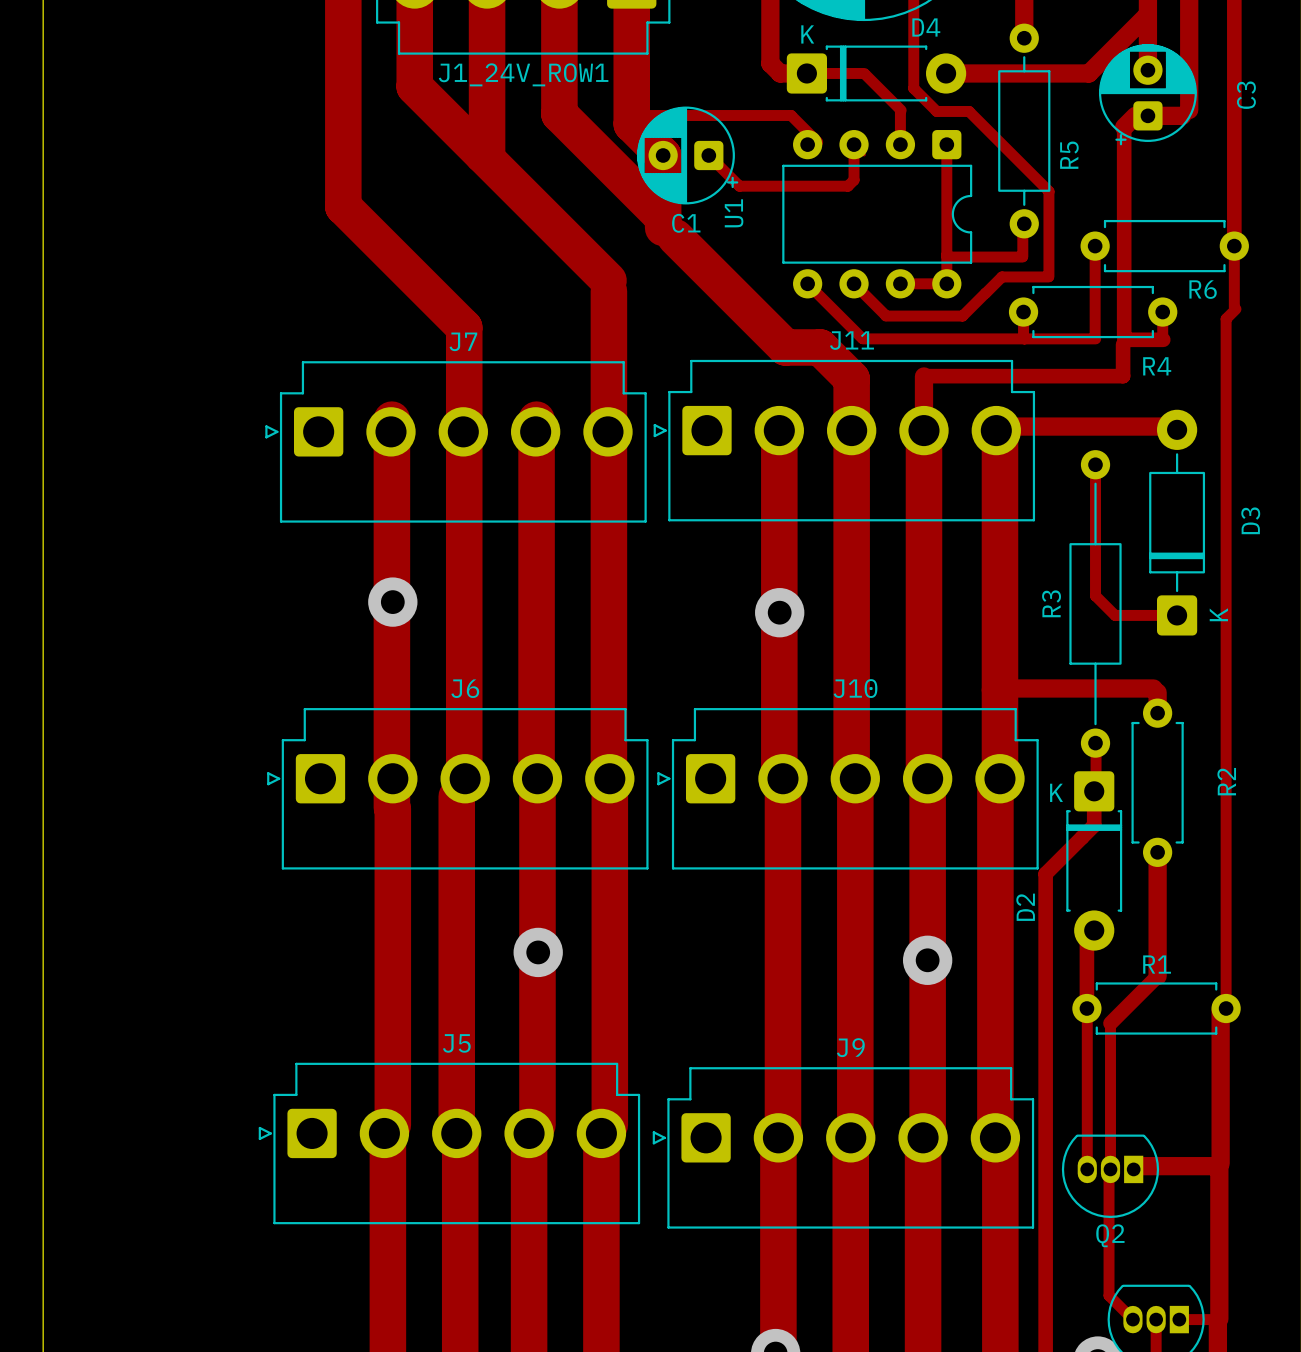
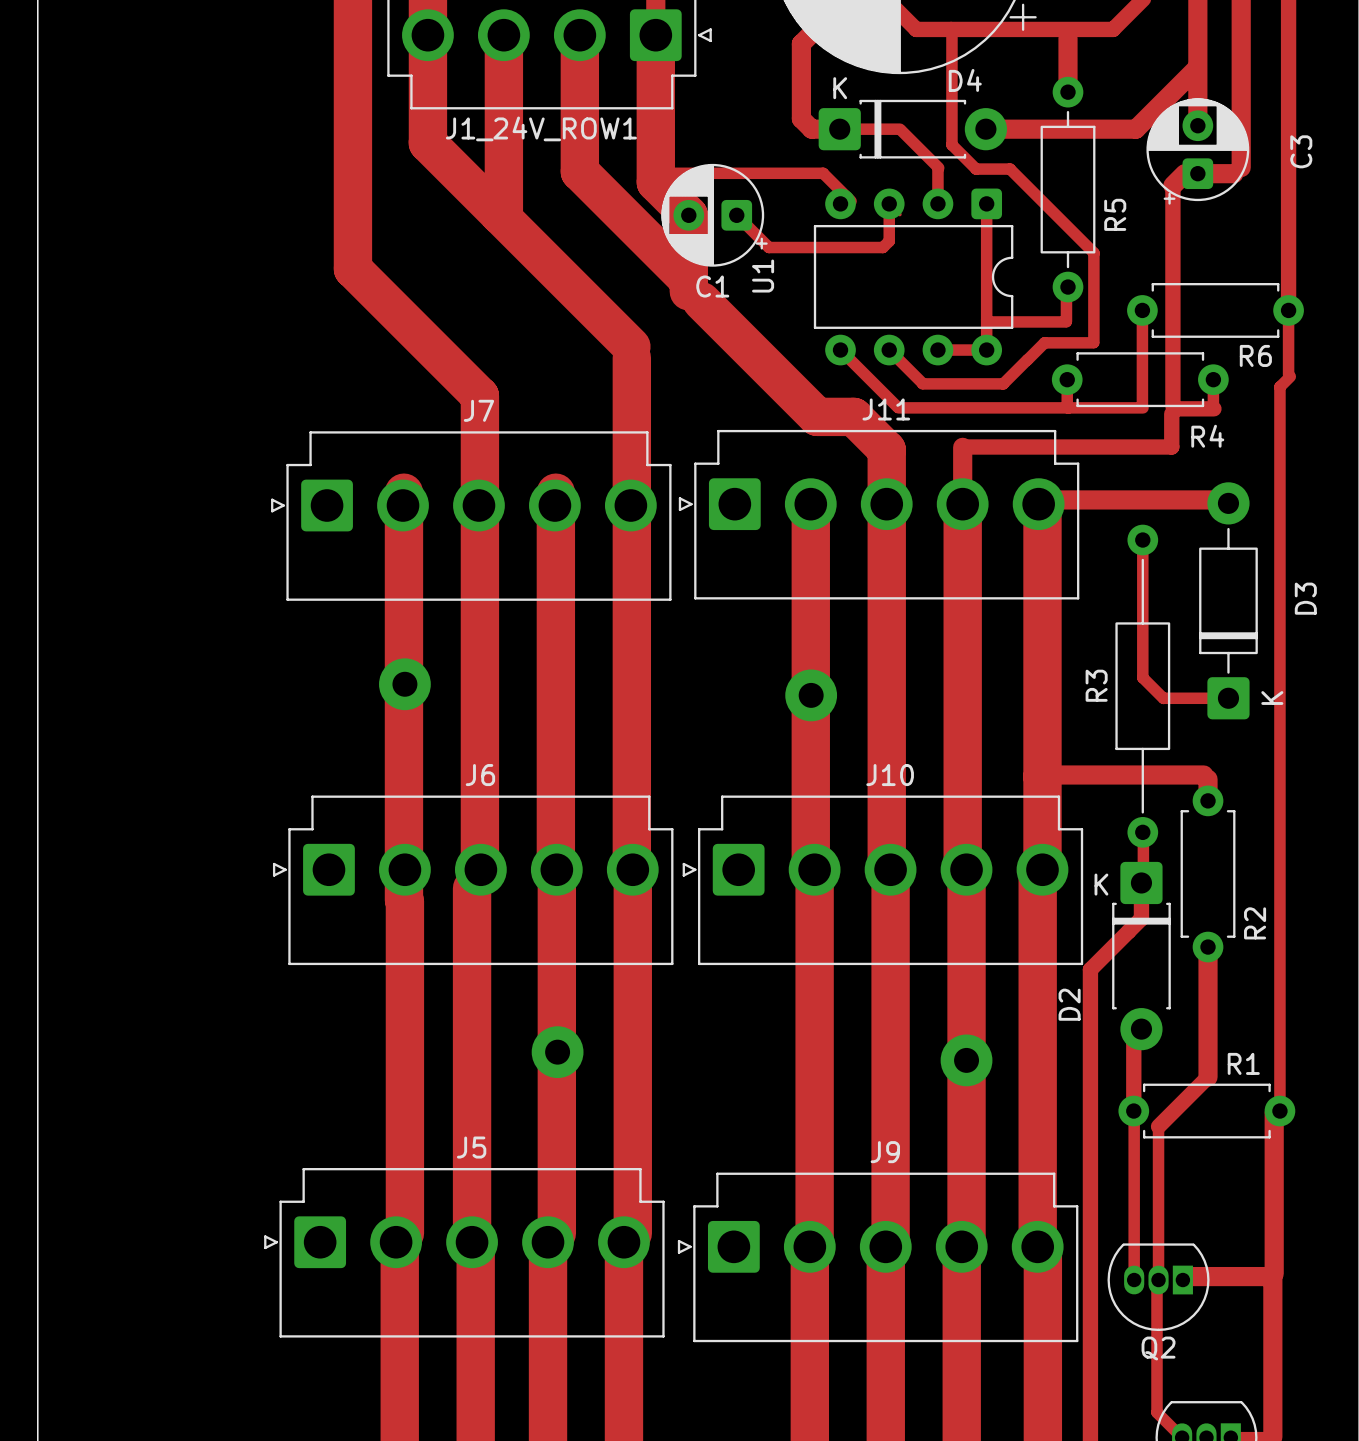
R2 name position: R2 (1226, 781) -> R2 (1255, 923)
R1 name position: R1 (1157, 964) -> R1 (1243, 1063)

